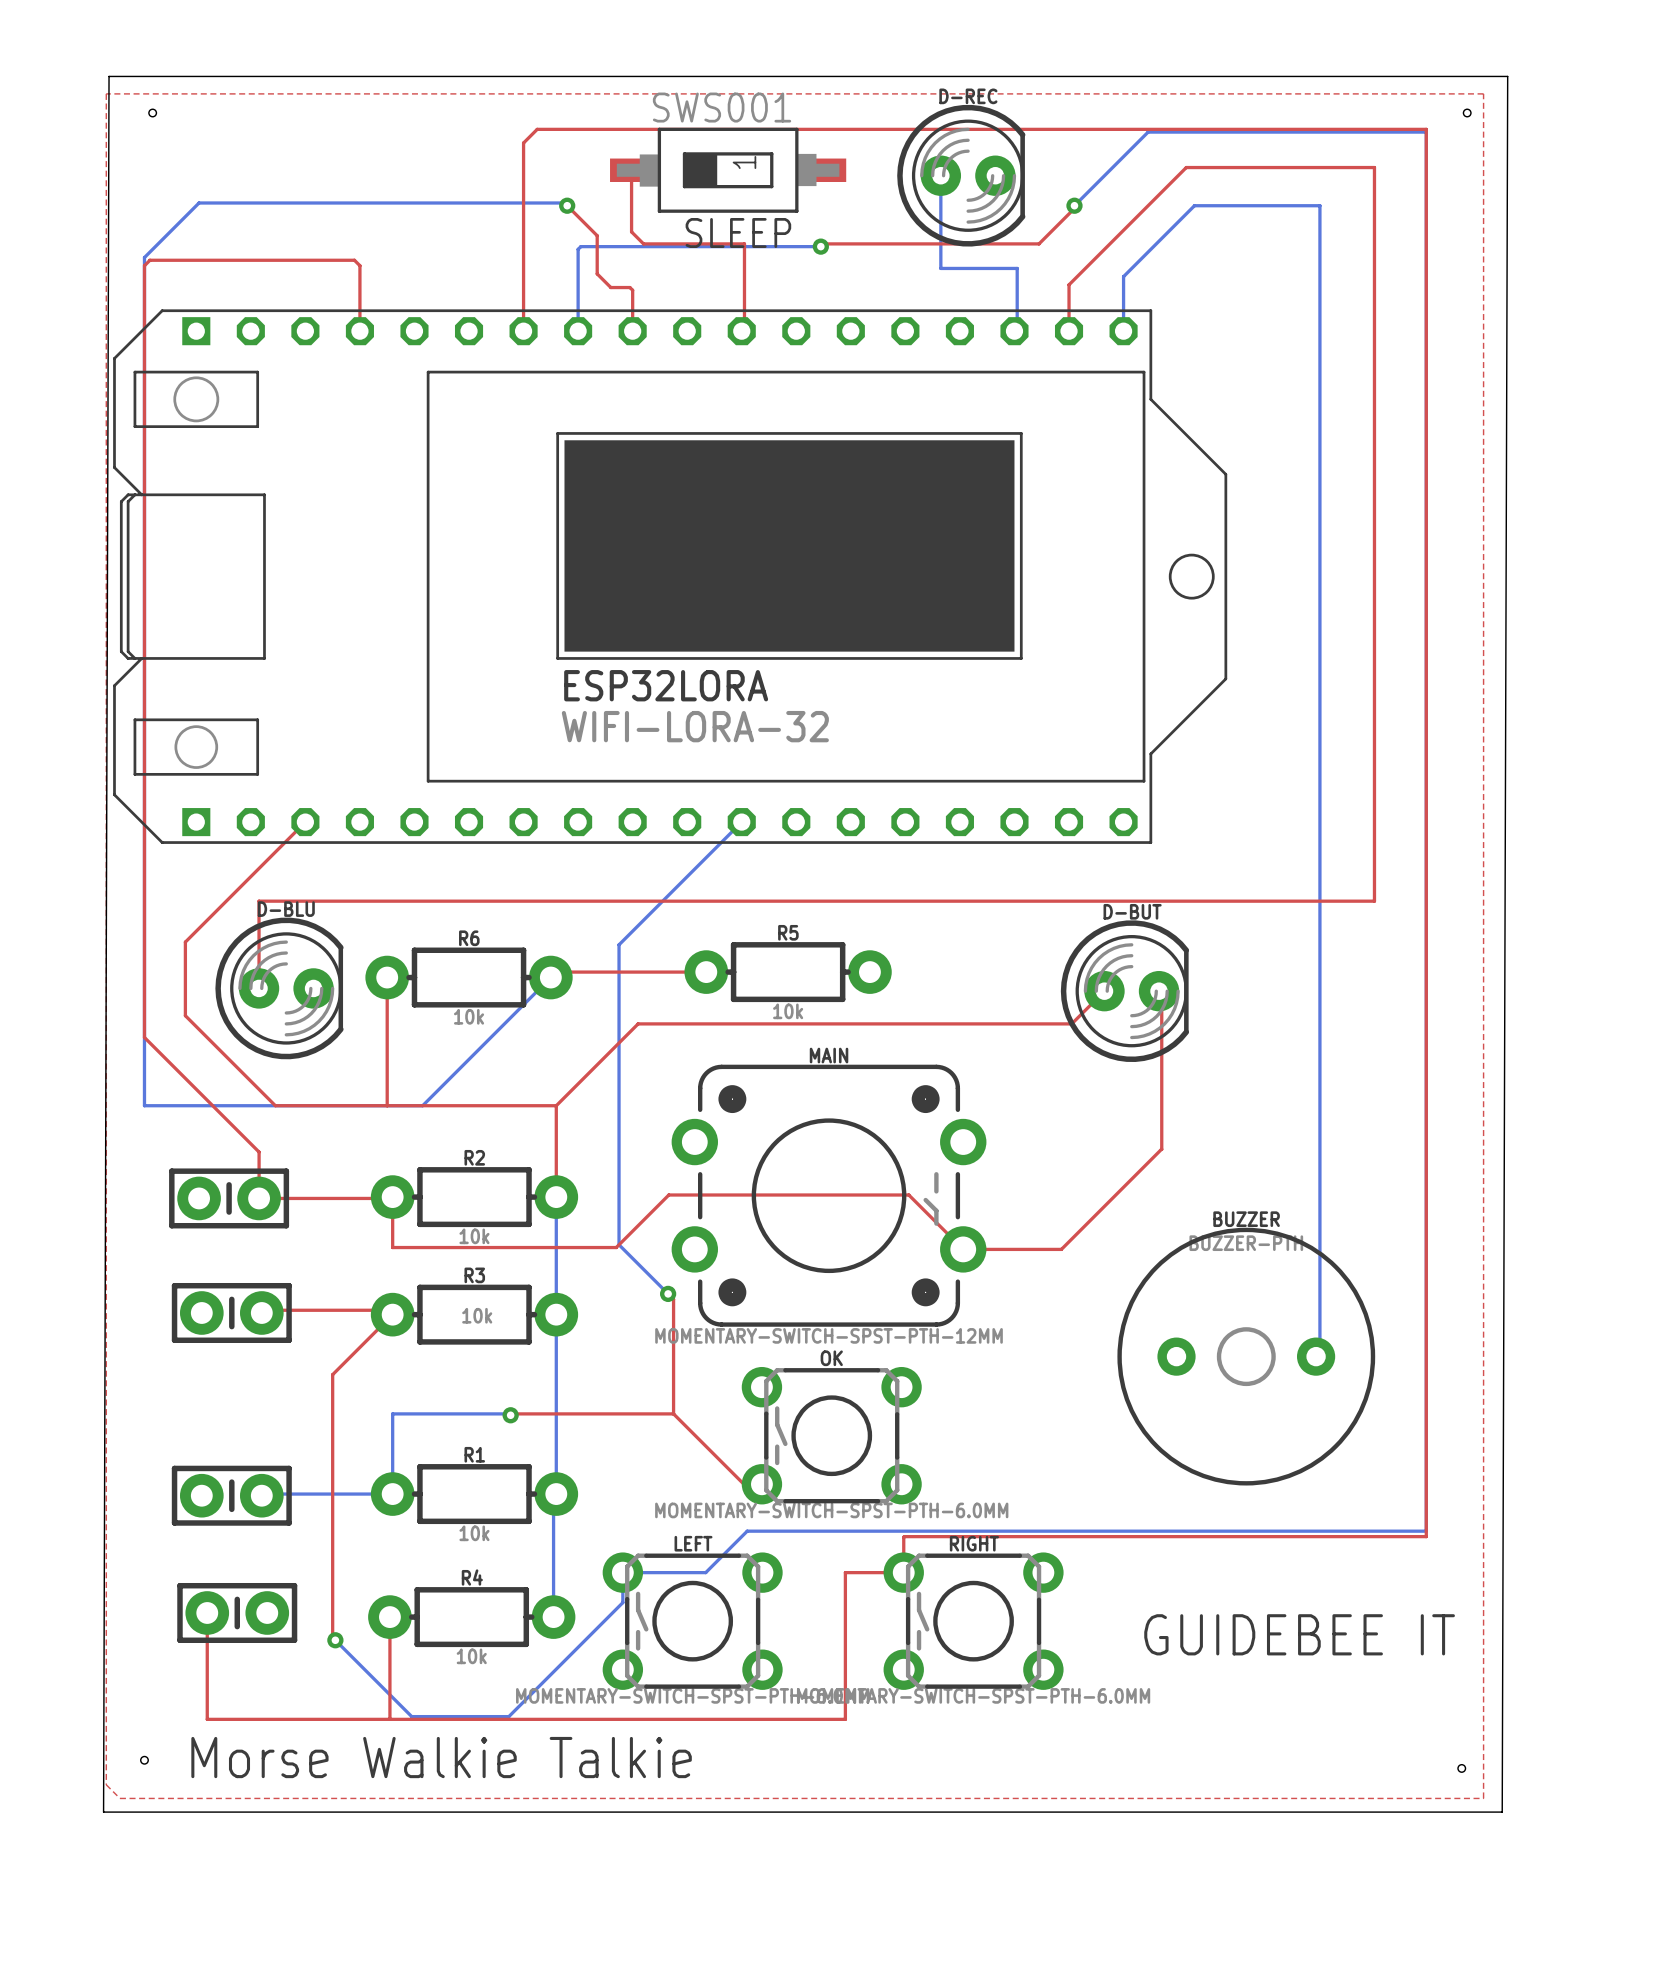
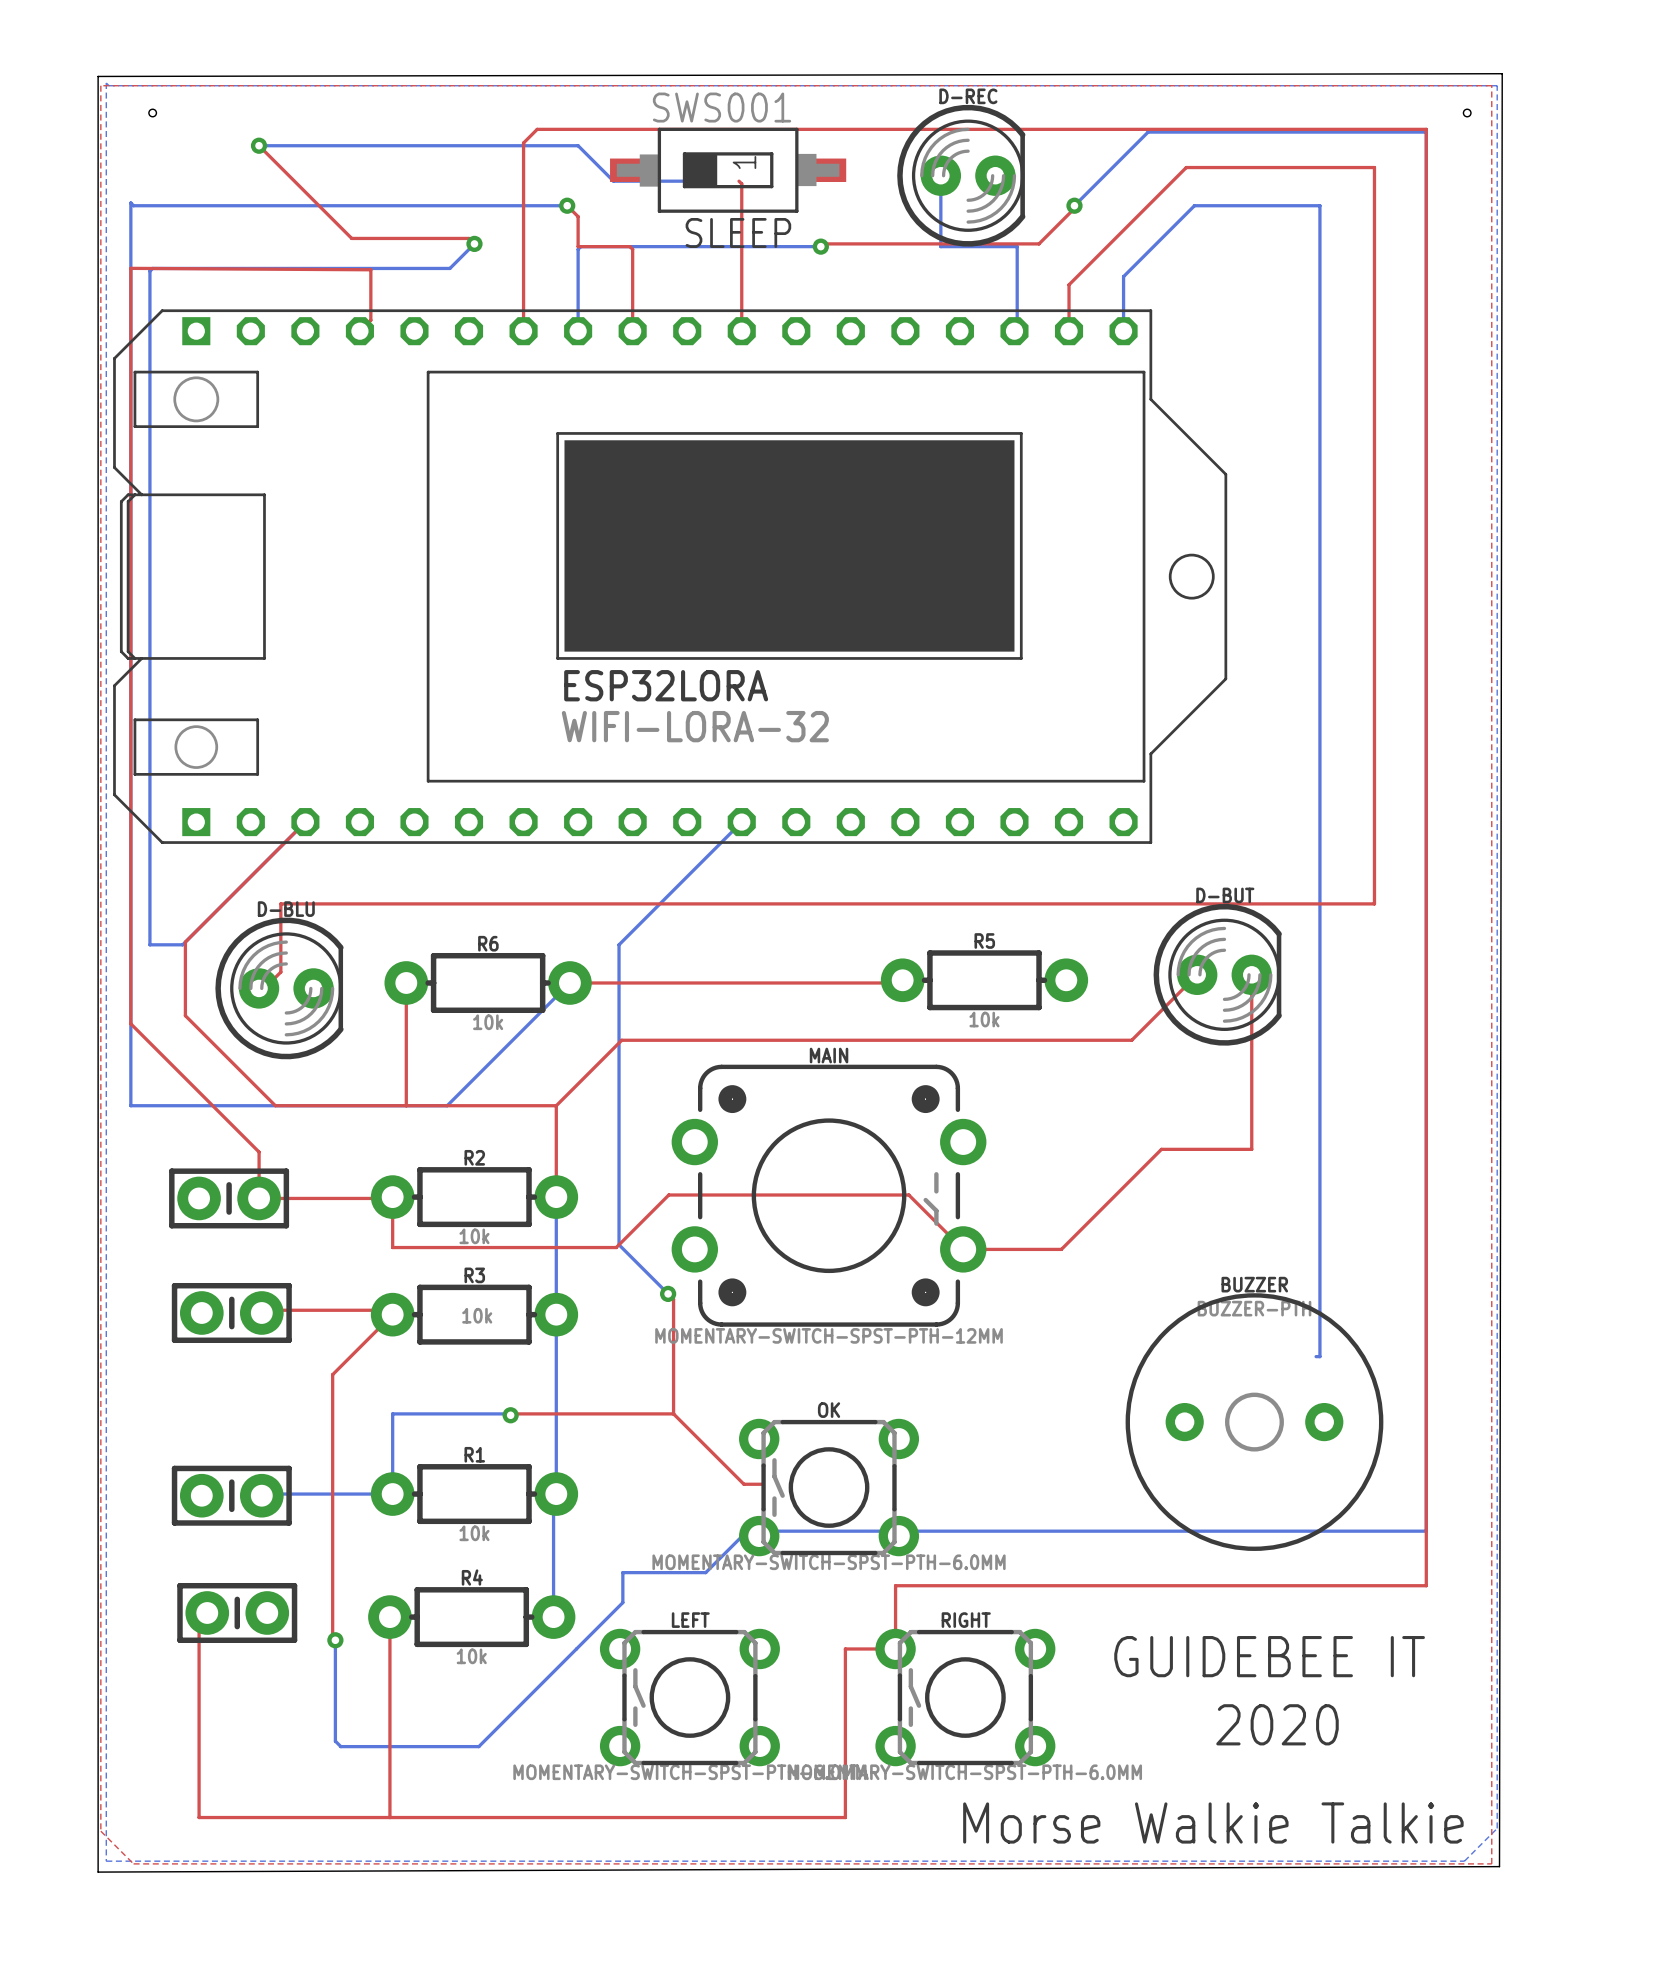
board edge: (109, 76) (1507, 76) (1502, 1812) (103, 1812) (109, 76) -> (1502, 73) (98, 76) (98, 1872) (1499, 1866) (1502, 73)
bottom zone outline: none -> (106, 82) (106, 1861) (1464, 1861) (1497, 1828) (1497, 85) (109, 85) (106, 82)
top zone outline: (106, 93) (106, 1784) (119, 1798) (1483, 1798) (1483, 93) (106, 93) -> (100, 85) (100, 1831) (133, 1863) (1491, 1863) (1491, 85) (100, 85)
top track: none -> (259, 145) (351, 238) (469, 238) (474, 243)
bottom track: none -> (259, 145) (578, 145) (613, 181) (684, 181)
via: none -> (259, 145)
top track: (631, 170) (631, 231) (643, 243) (744, 243) (744, 328) (741, 331) -> (739, 181) (741, 183) (741, 331)
bottom track: (567, 205) (564, 202) (199, 202) (144, 257) (144, 1105) -> (567, 205) (133, 205) (130, 202) (130, 1105) (144, 1105)
top track: (578, 216) (597, 235) (597, 273) (610, 287) (629, 287) (632, 290) -> (578, 216) (578, 246) (629, 246) (632, 249) (632, 290)
bottom track: none -> (474, 243) (449, 268) (152, 268) (149, 271) (149, 944) (182, 944) (305, 822)
via: none -> (474, 243)
bottom track: (940, 246) (940, 268) (1017, 268) -> (940, 246) (1017, 246) (1017, 268)
top track: (359, 331) (359, 265) (354, 260) (149, 260) (144, 265) (144, 1037) -> (359, 331) (370, 320) (370, 269) (130, 268) (130, 1023) (144, 1037)
top track: (1374, 901) (259, 901) (259, 988) -> (1374, 901) (1374, 903) (280, 903) (280, 972) (272, 980)
top track: (706, 972) (556, 972) (550, 977) -> none
R5 position: (788, 972) -> (984, 980)
top track: (387, 977) (387, 1105) -> none
R6 position: (469, 977) -> (488, 982)
bottom track: (550, 977) (422, 1105) -> (569, 982) (447, 1105) (422, 1105)
top track: none -> (902, 980) (899, 982) (569, 982)
top track: none -> (406, 982) (406, 1105)
top track: (1104, 991) (1071, 1023) (638, 1023) (621, 1040) -> (1197, 974) (1131, 1040) (621, 1040)
D-BUT position: (1124, 991) -> (1217, 974)
top track: (1159, 991) (1161, 993) (1161, 1149) -> (1251, 974) (1251, 1149) (1161, 1149)
BUZZER position: (1246, 1356) -> (1254, 1422)
OK position: (831, 1435) -> (829, 1487)
top track: (1426, 1536) (904, 1536) (903, 1572) (845, 1572) (845, 1648) -> (1426, 1536) (1426, 1585) (895, 1585) (895, 1648) (845, 1648)
top track: (207, 1612) (207, 1719) (845, 1719) -> (199, 1612) (199, 1817) (845, 1817) (845, 1719)
LEFT position: (692, 1621) -> (689, 1697)
RIGHT position: (973, 1621) -> (965, 1697)
text position: GUIDEBEE IT (1299, 1634) -> GUIDEBEE IT (1269, 1656)
bottom track: (335, 1640) (411, 1716) (508, 1716) -> (335, 1640) (335, 1741) (340, 1746) (478, 1746) (508, 1716)
top track: none -> (389, 1719) (389, 1817)
text: none -> 2020 (1277, 1724)
text: Morse Walkie Talkie (441, 1757) -> none
hole: (144, 1760) -> none
hole: (1461, 1768) -> none
text: none -> Morse Walkie Talkie (1213, 1822)

